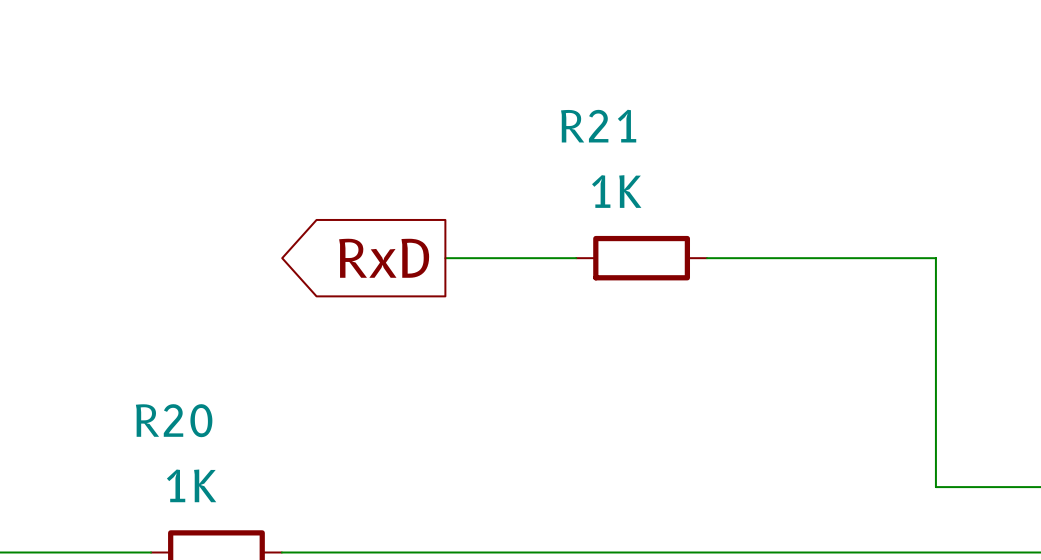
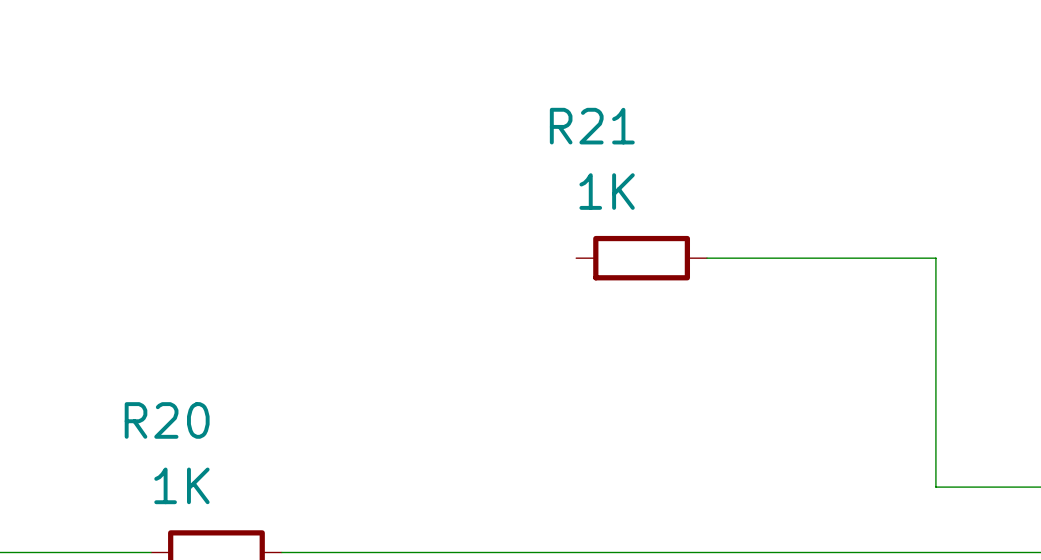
global label: RxD (384, 258) -> none
wire: (445, 258) (576, 258) -> none

